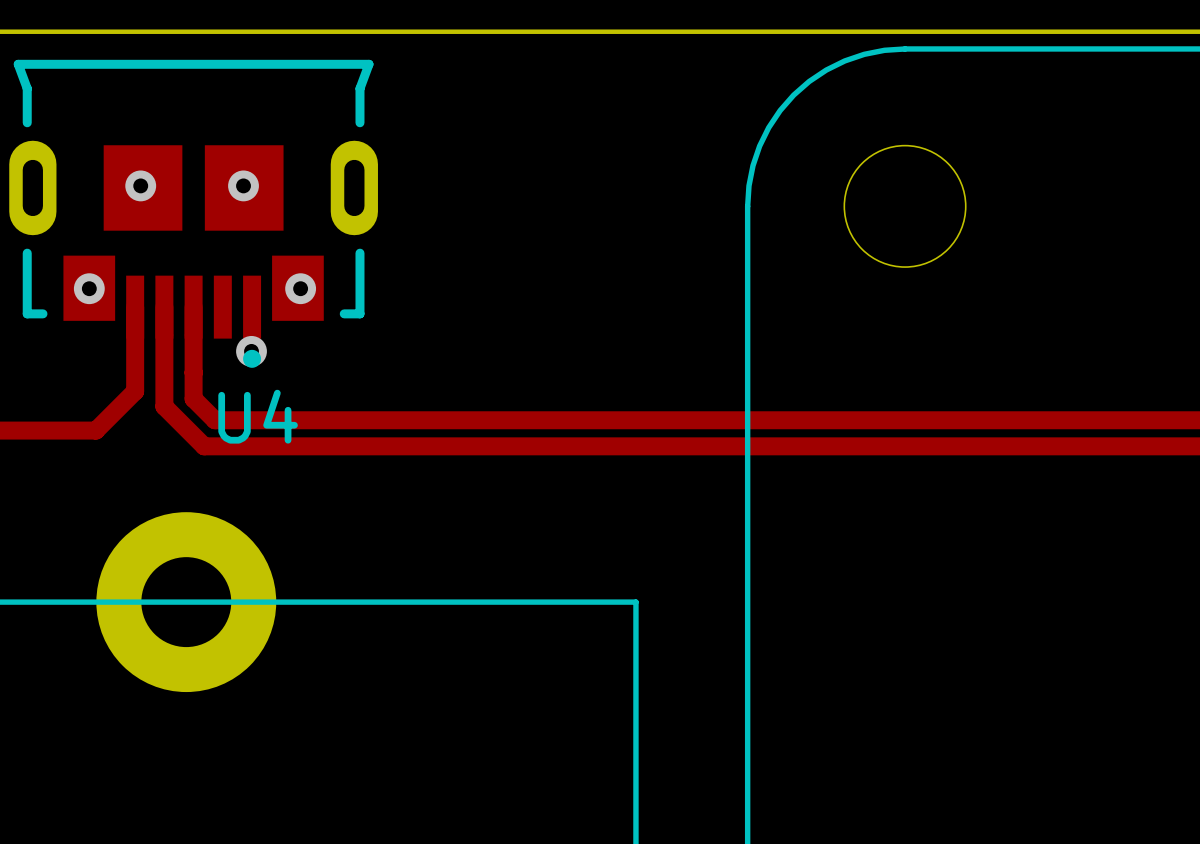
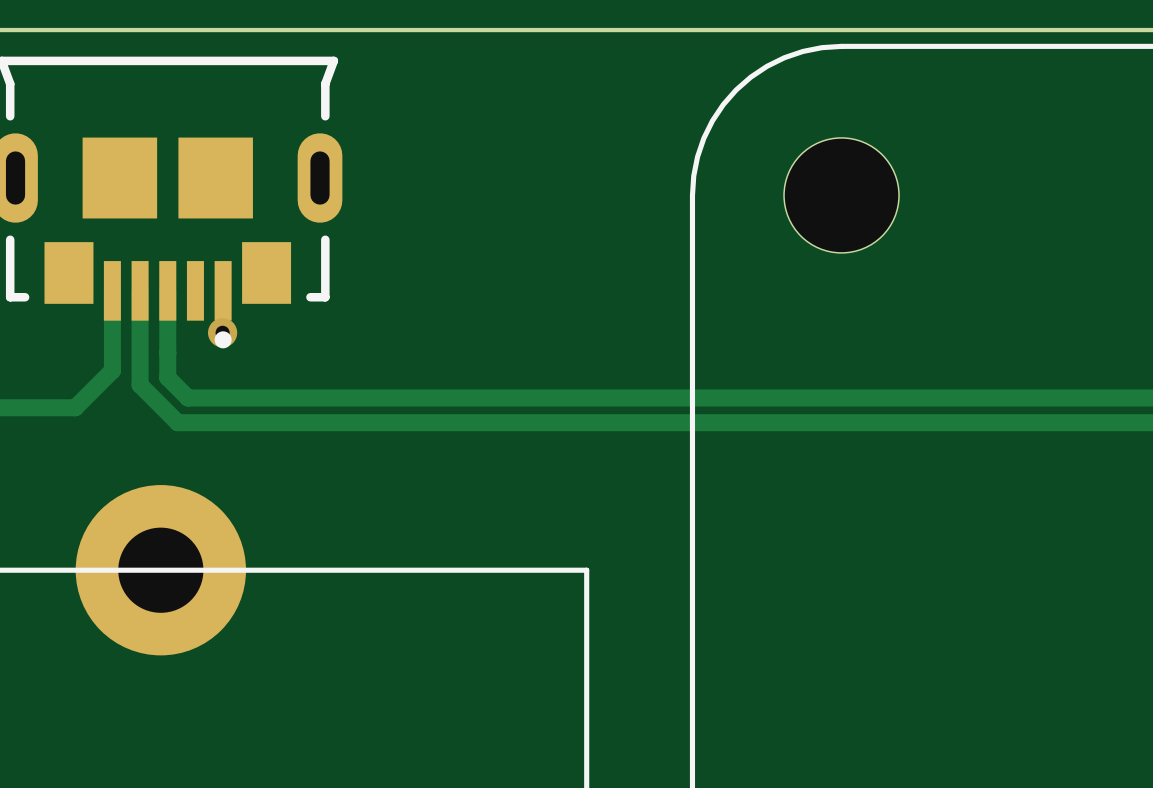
via: (140, 185) -> none
via: (243, 185) -> none
via: (89, 288) -> none
via: (300, 288) -> none
U4 name: U4 (258, 416) -> none

